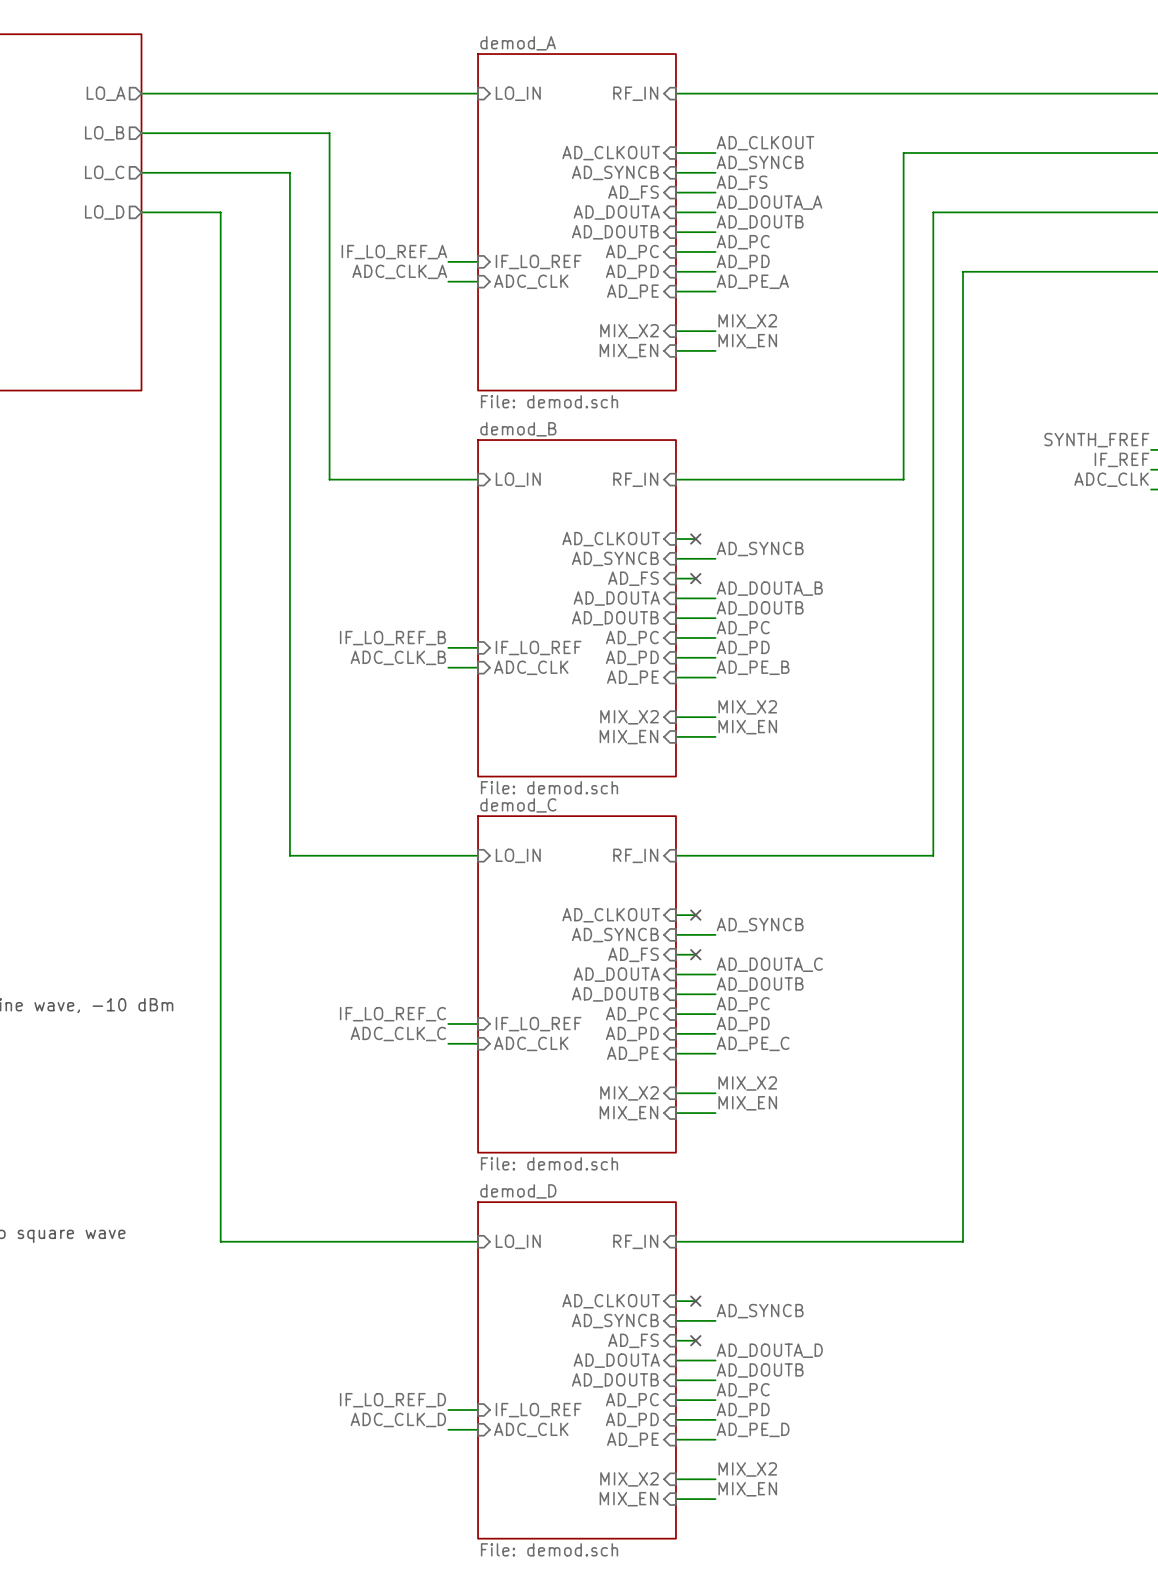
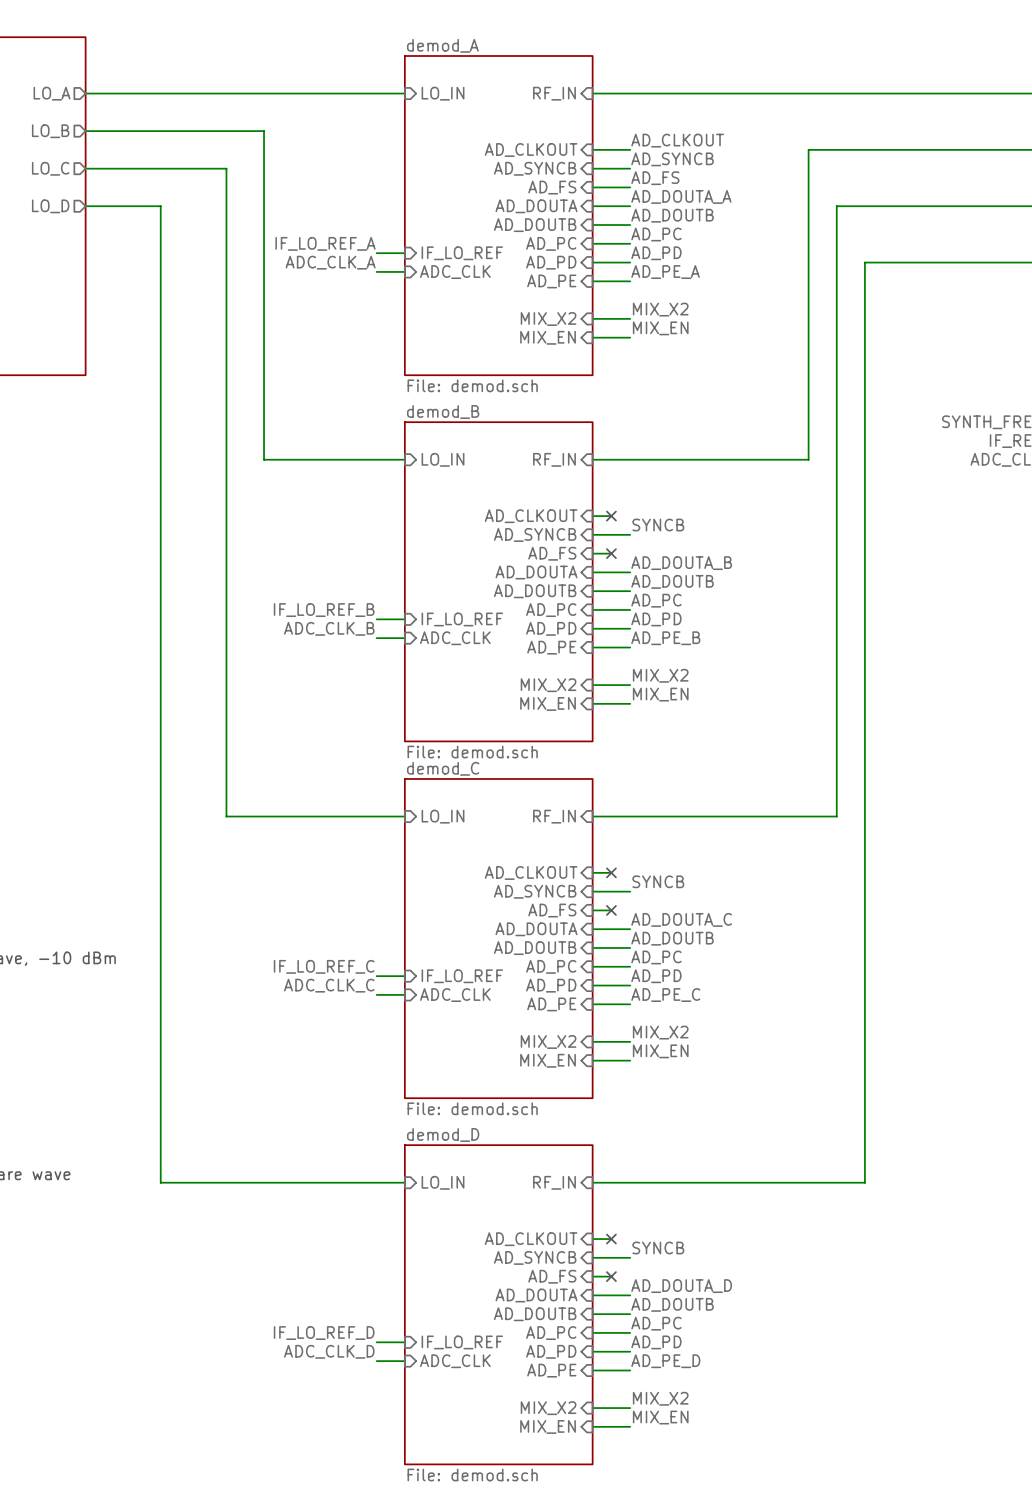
label: AD_SYNCB (760, 549) -> SYNCB (658, 525)
label: AD_SYNCB (760, 925) -> SYNCB (658, 881)
label: AD_SYNCB (760, 1311) -> SYNCB (658, 1248)

